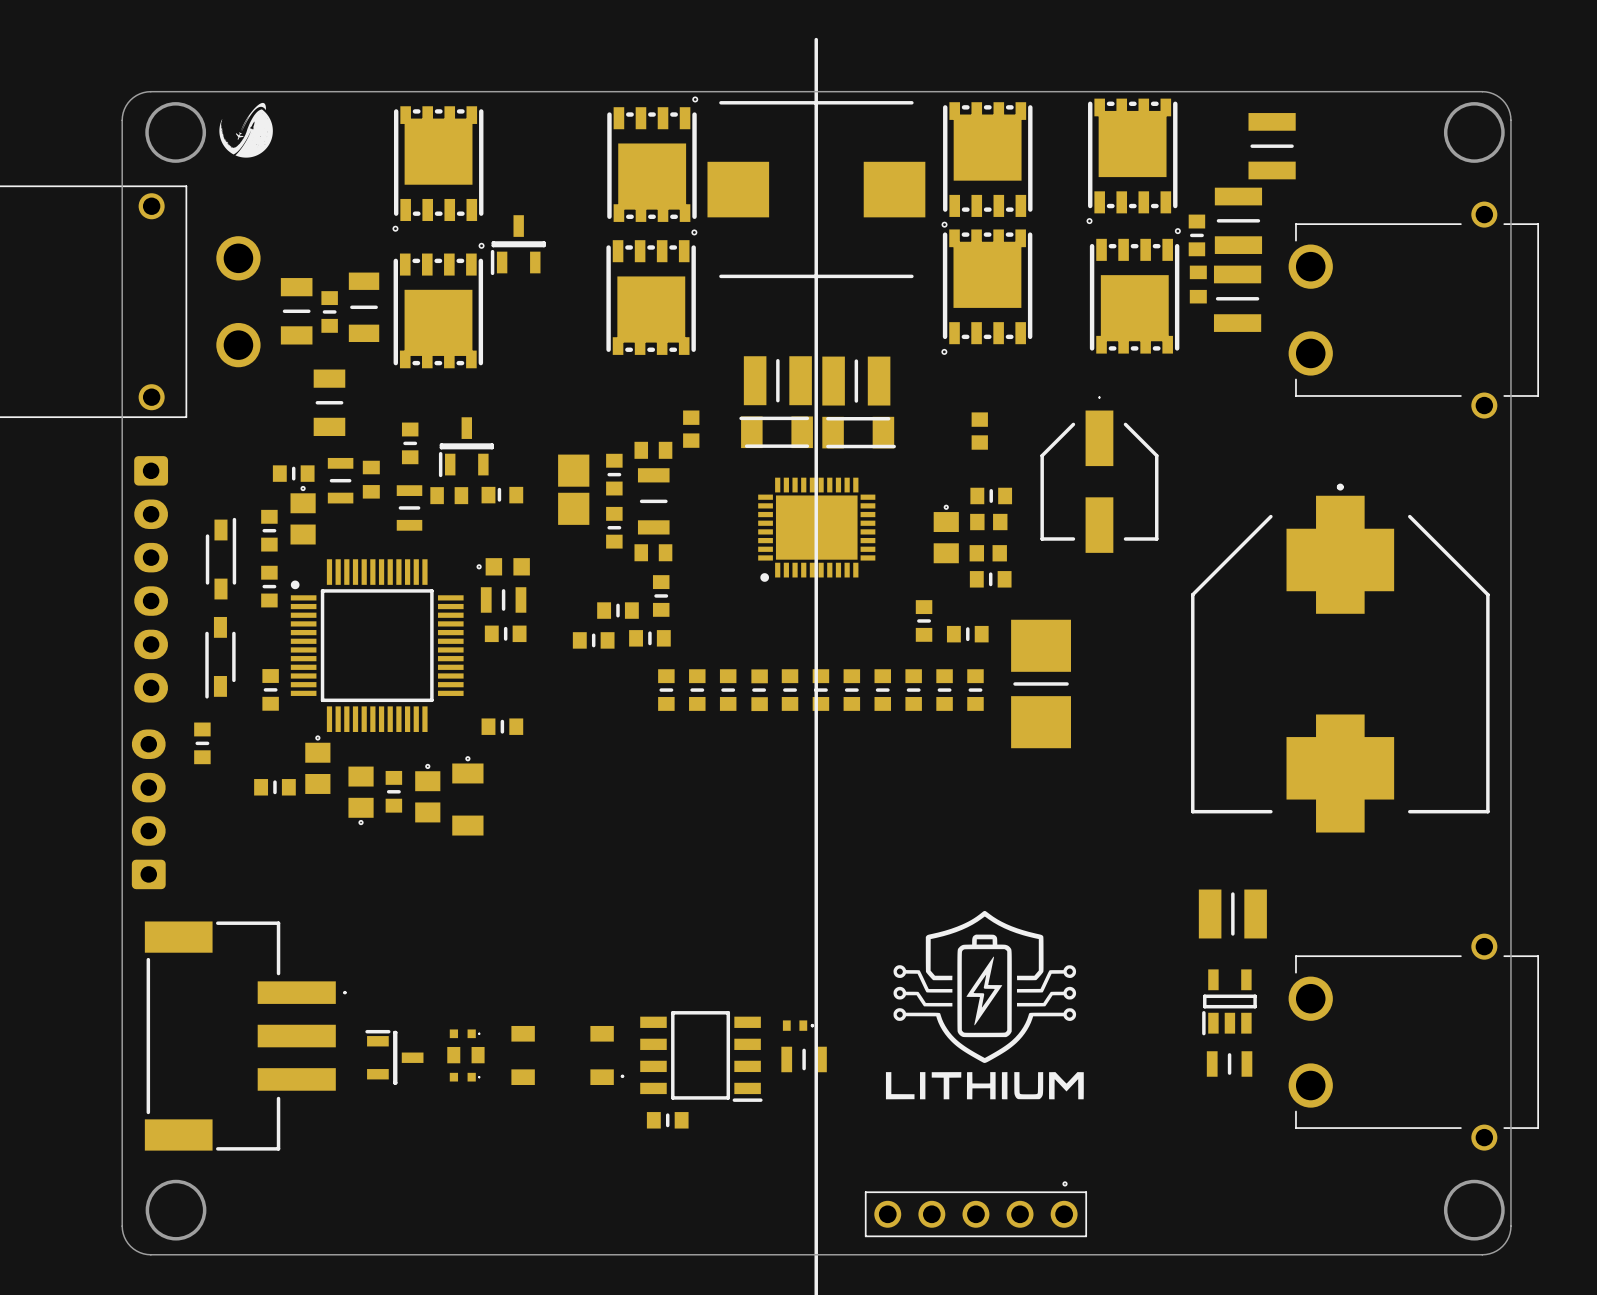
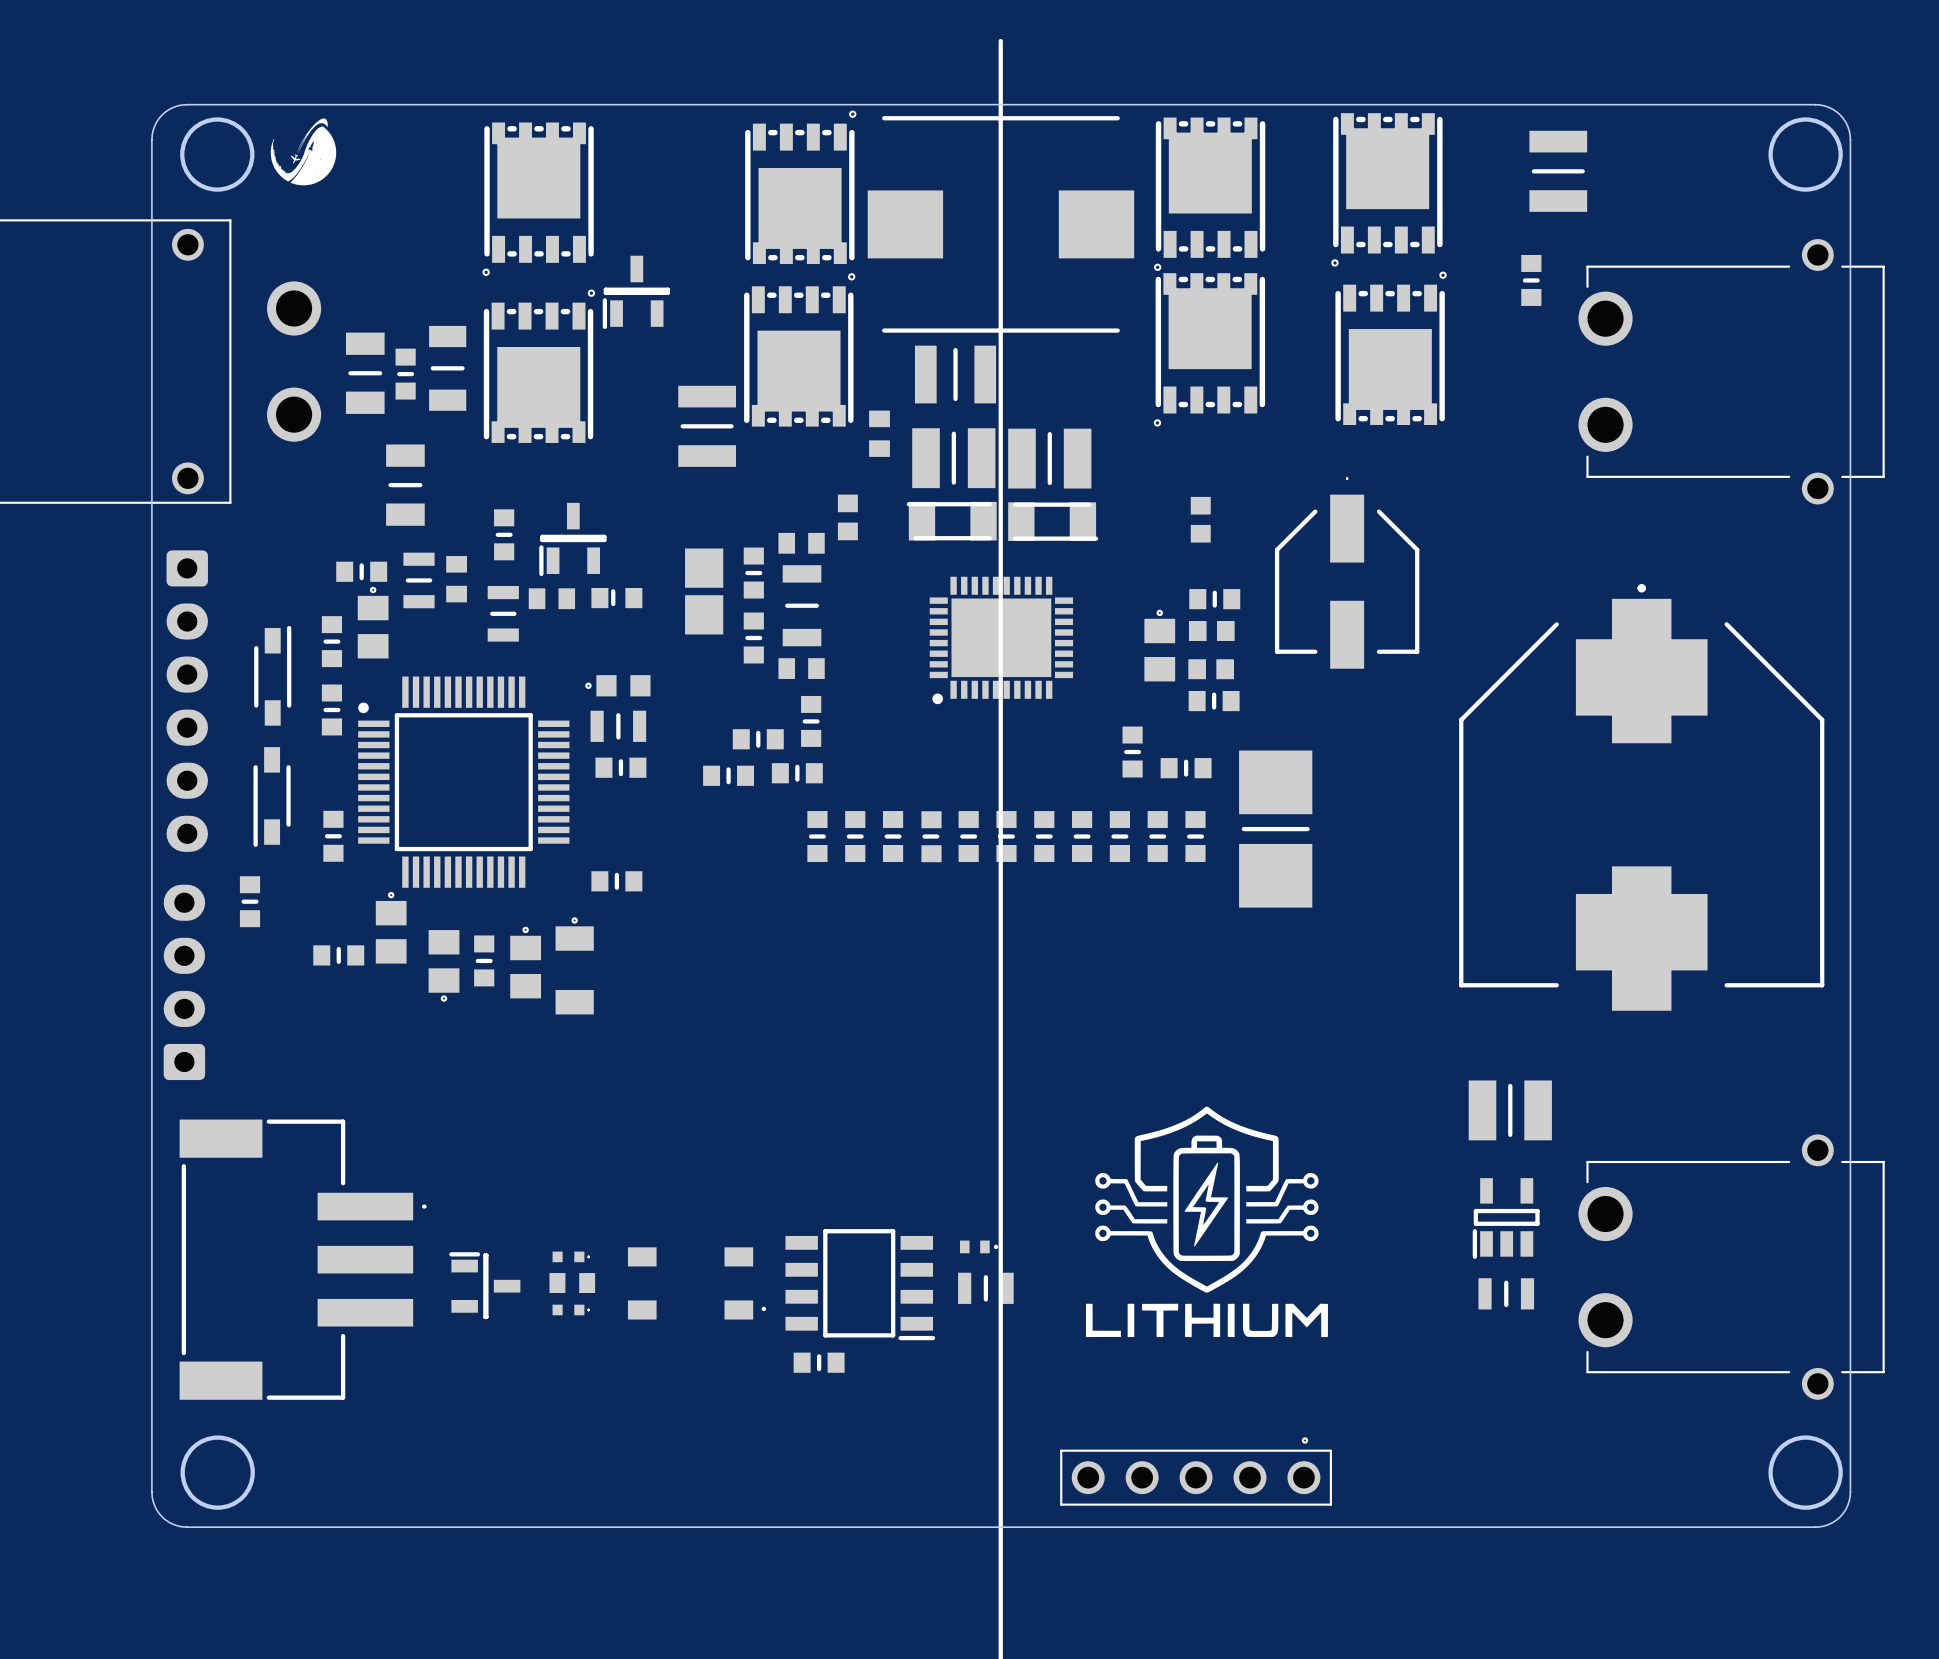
part: (1238, 220) -> none
part position: (1196, 235) -> (1531, 280)
part: (1198, 284) -> none
part: (1237, 298) -> none
part: none -> (955, 374)
part: none -> (707, 426)
part: none -> (879, 433)

